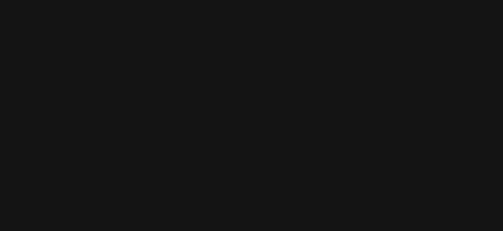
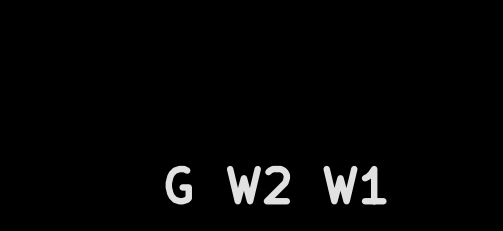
text: none -> G (178, 185)
text: none -> W2 (258, 185)
text: none -> W1 (355, 185)

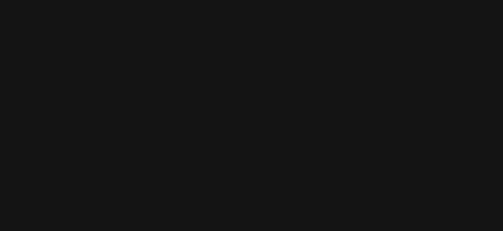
text: G (178, 185) -> none
text: W2 (258, 185) -> none
text: W1 (355, 185) -> none

